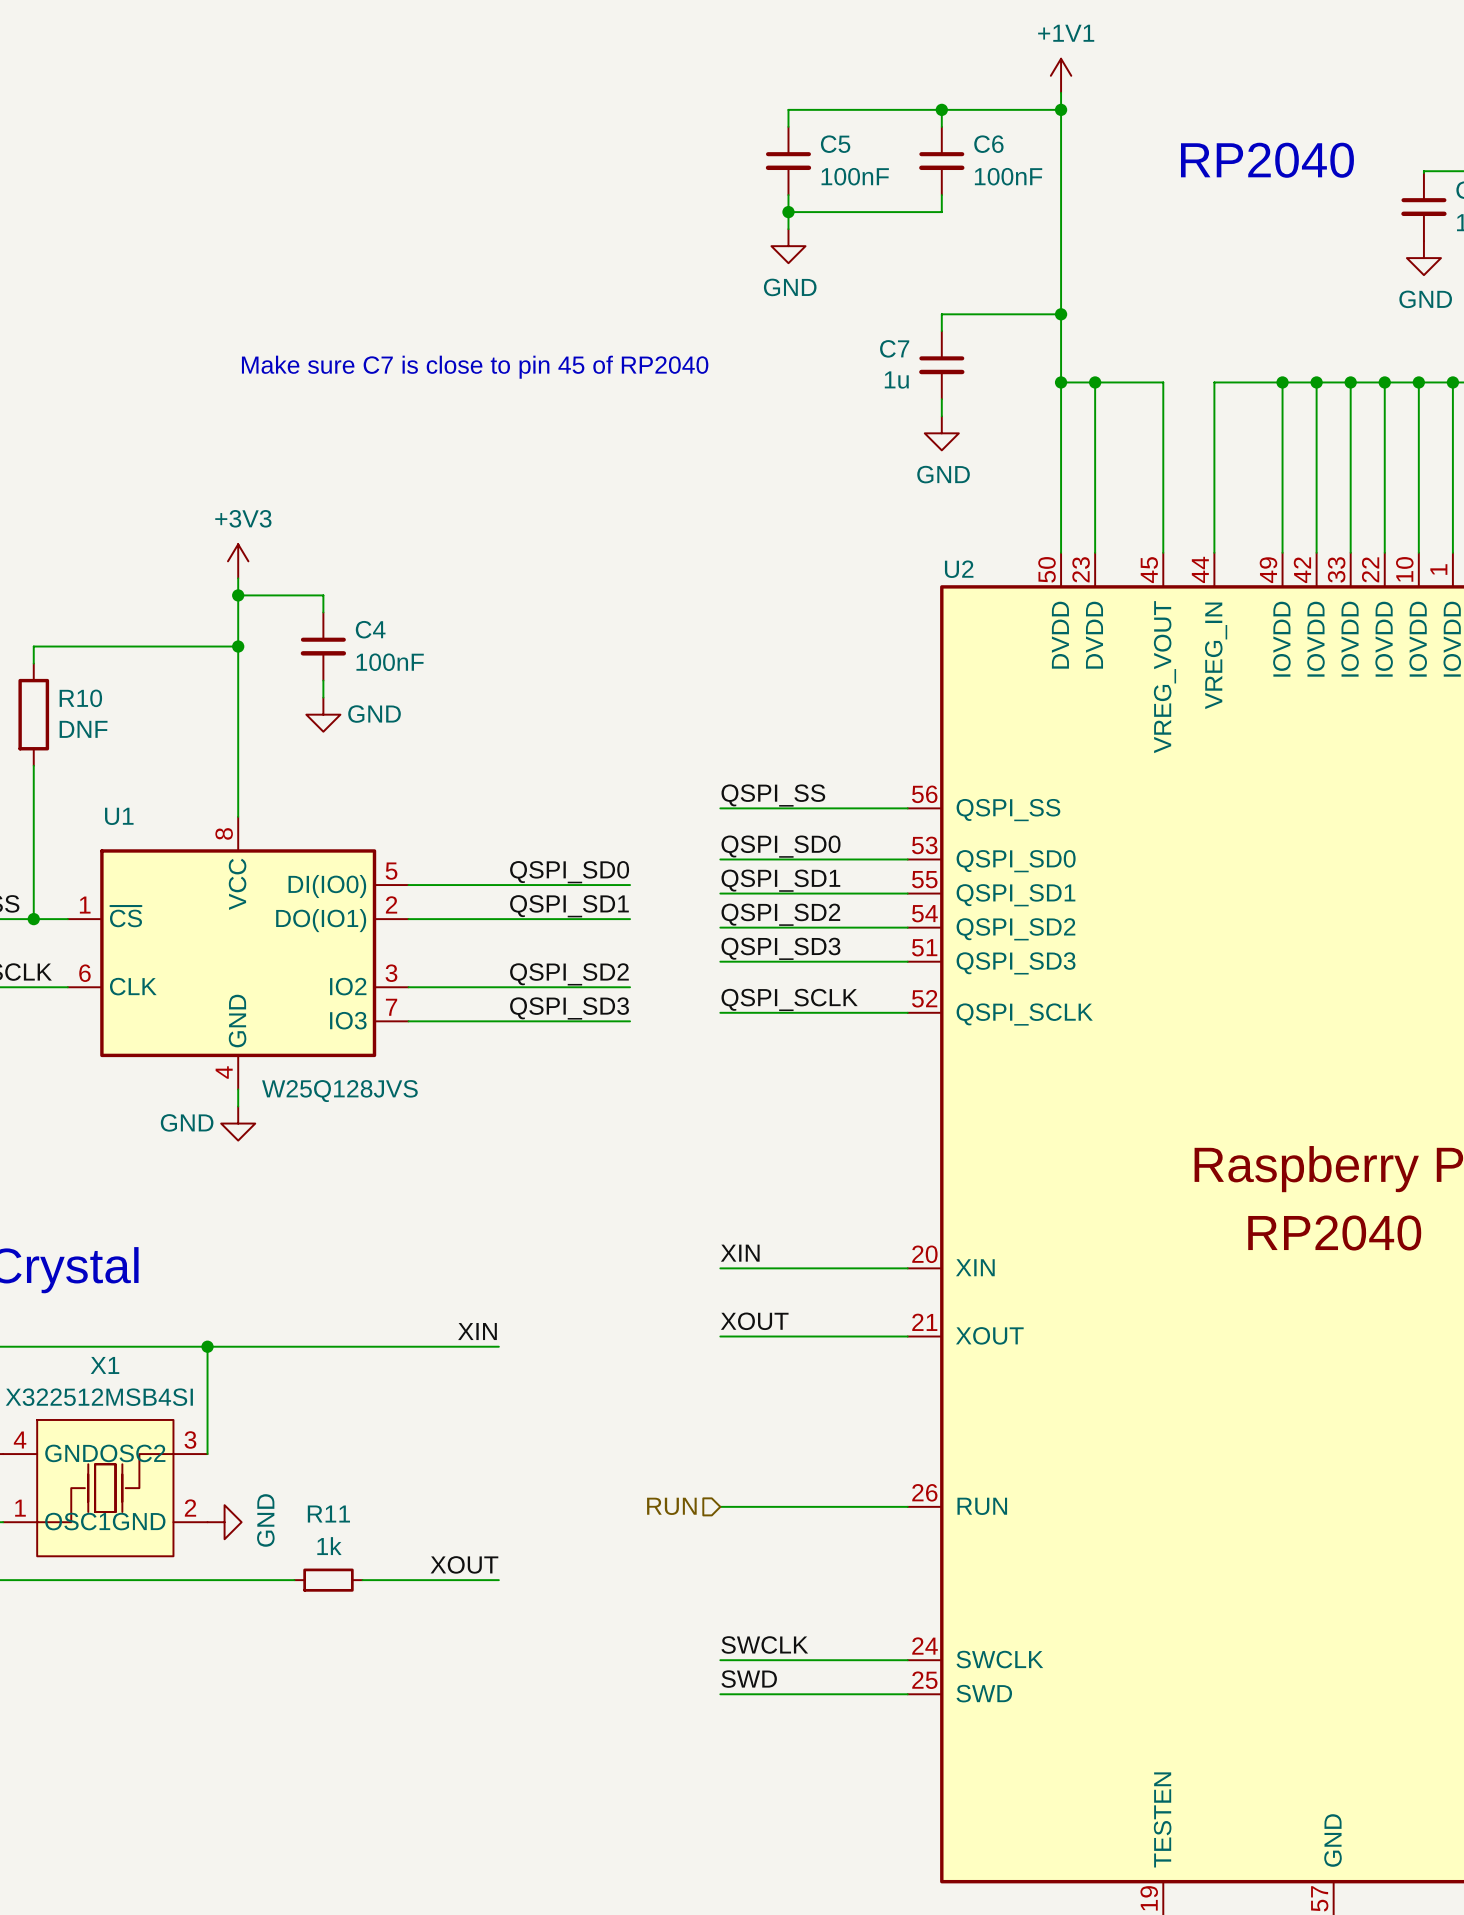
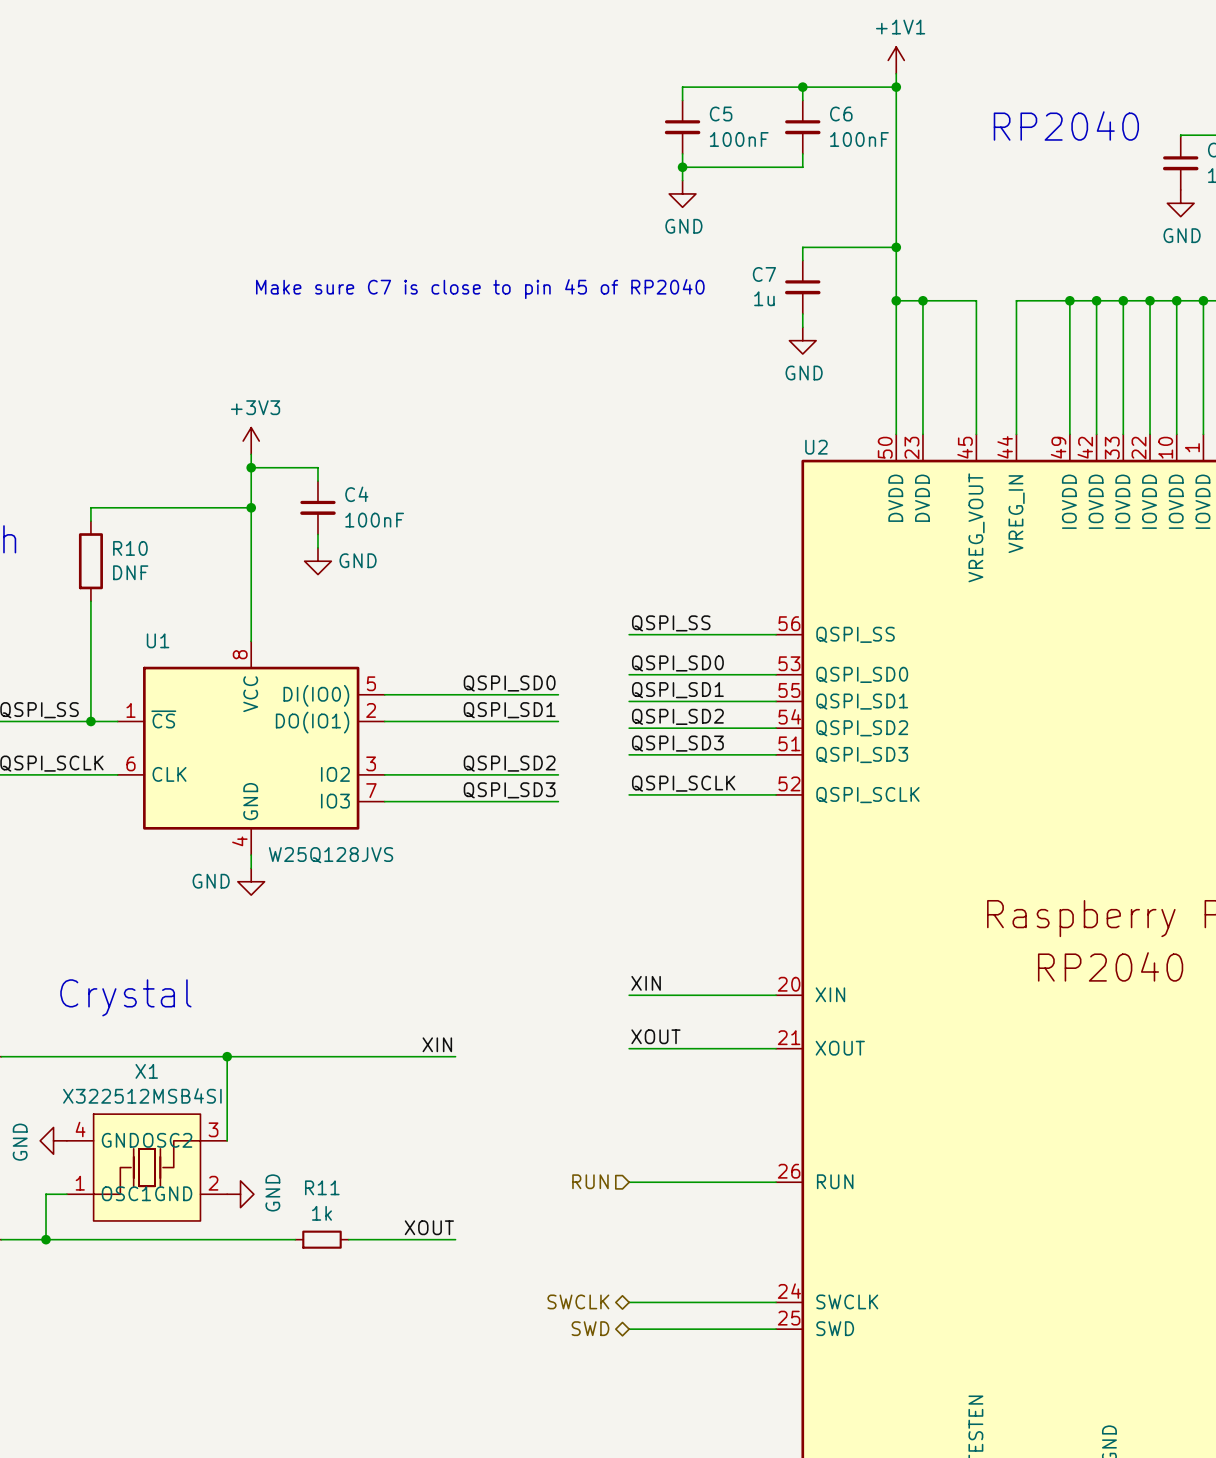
label: SWCLK (764, 1644) -> none
hierarchical label: none -> SWCLK (578, 1301)
label: SWD (749, 1679) -> none
hierarchical label: none -> SWD (590, 1328)

